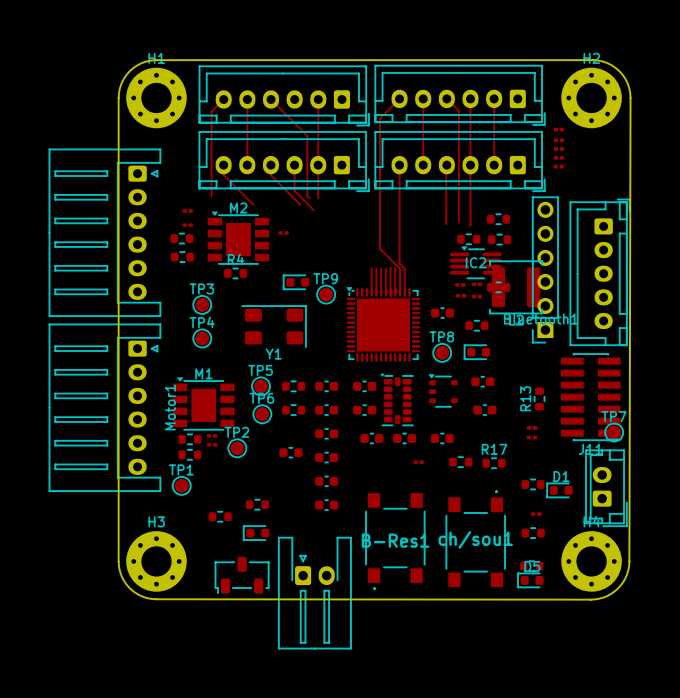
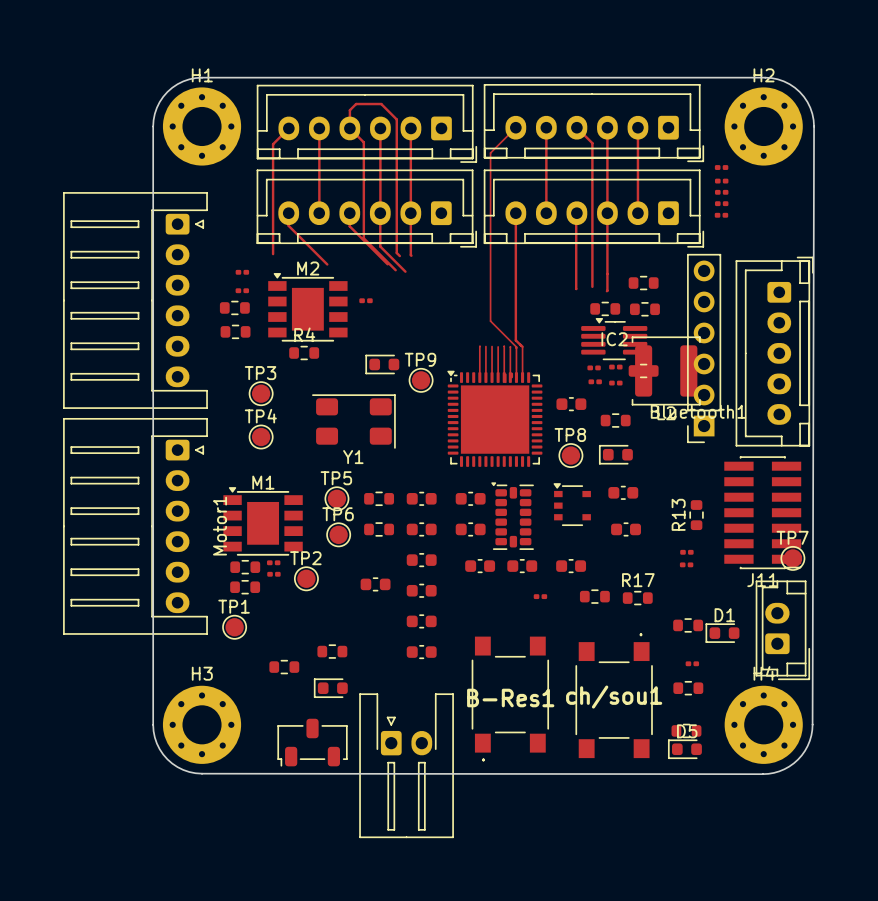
top track: none -> (380, 128) (380, 213)
top track: (281, 110) (307, 135) -> (349, 128) (349, 110) (356, 104) (381, 104) (396, 119) (396, 175)
top track: none -> (363, 142) (363, 238) (395, 270)

